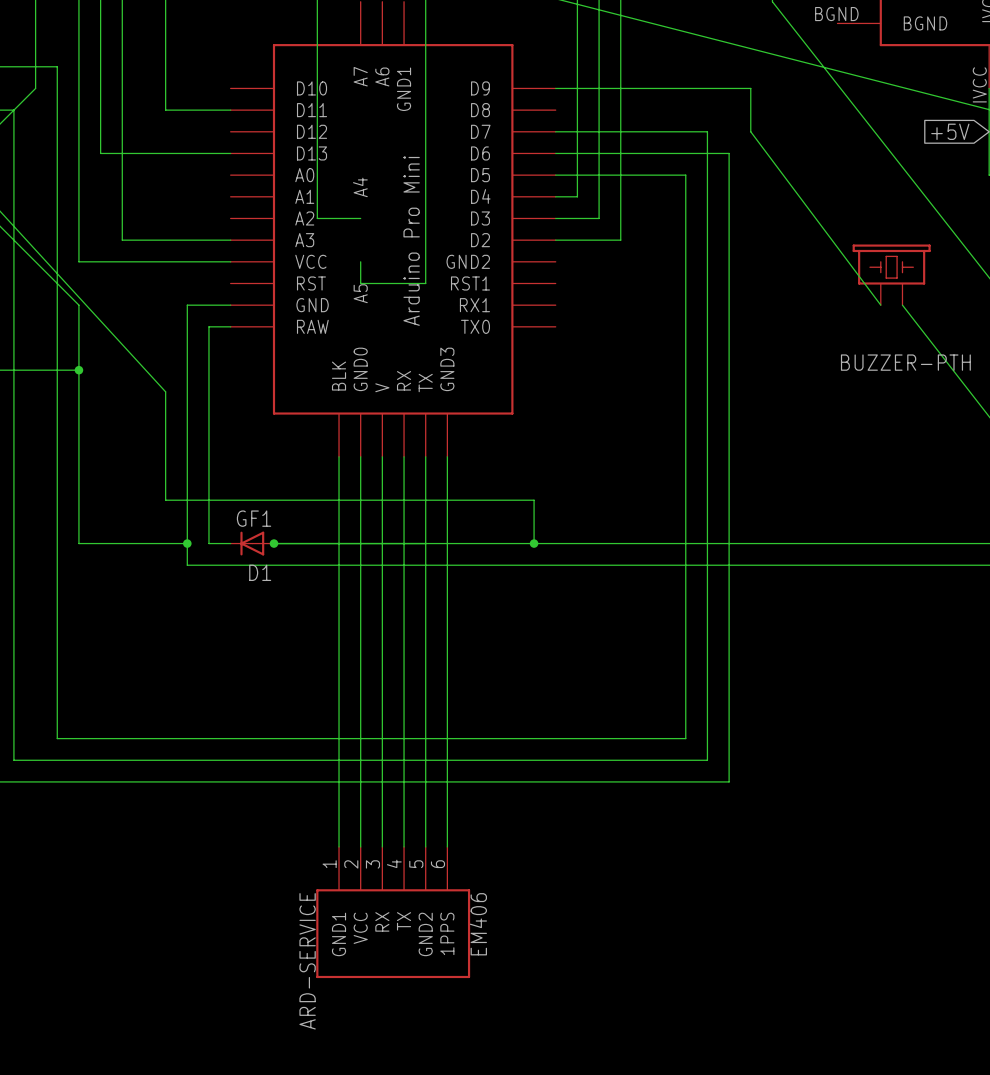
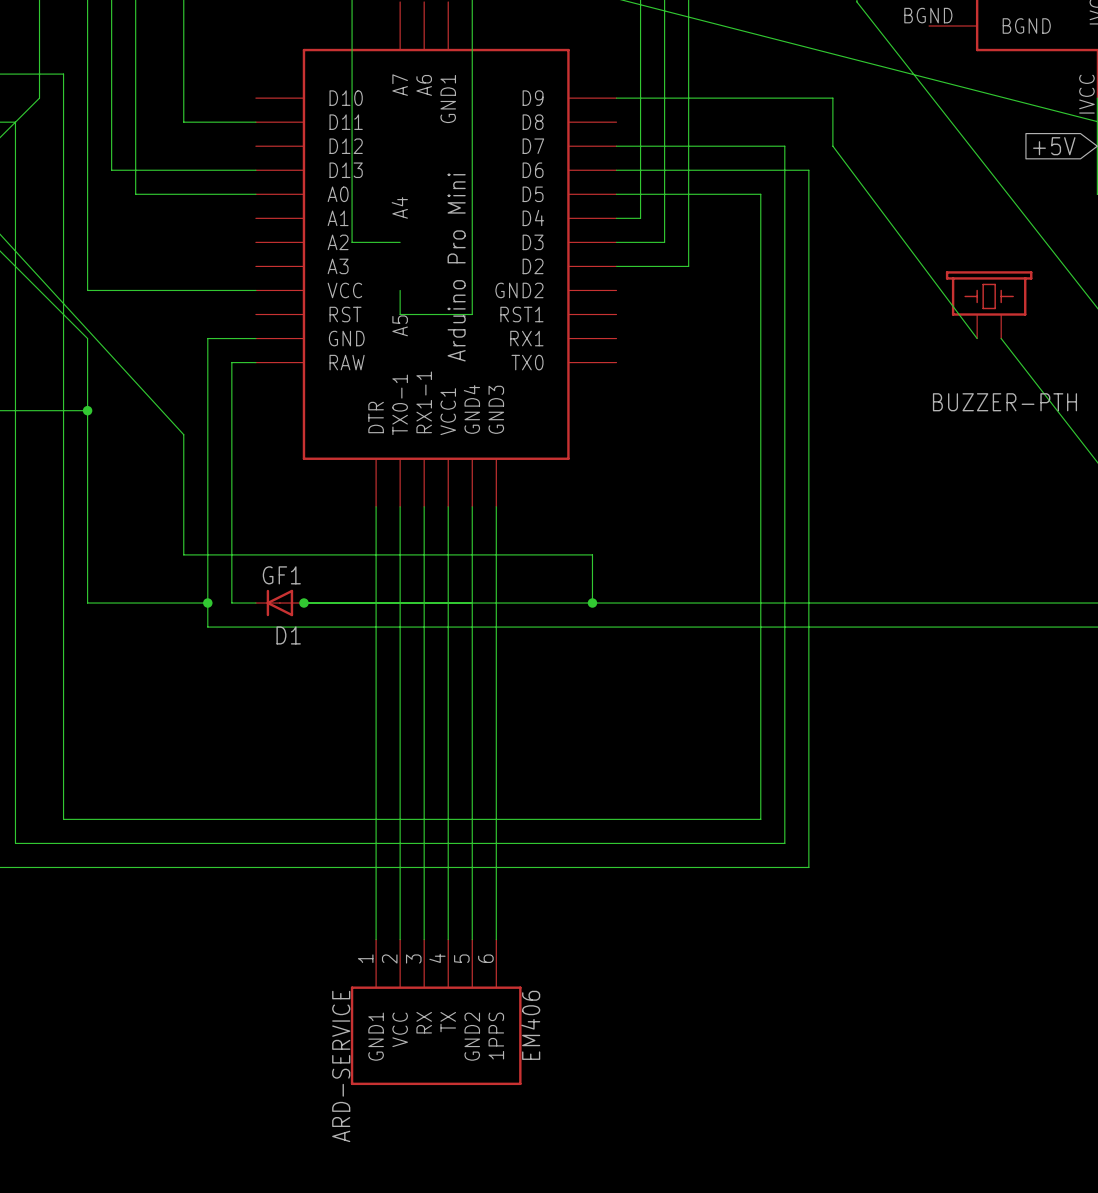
wire: (122, 175) (122, 240) (230, 240) -> (135, 194) (255, 194)
part pin name: GND0 (360, 369) -> TX0-1 (400, 404)
part pin name: BLK (339, 376) -> DTR (376, 417)
part pin name: RX (404, 380) -> VCC1 (448, 411)
part pin name: TX (425, 383) -> GND4 (471, 409)
part pin name: V (382, 387) -> RX1-1 (424, 402)

